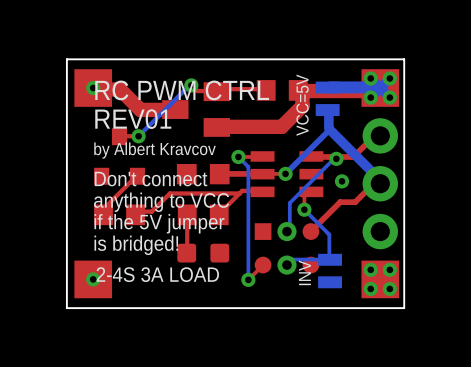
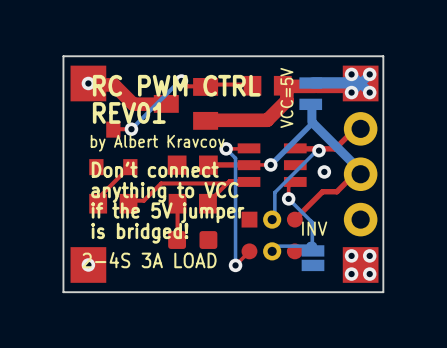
part: (330, 271) -> none
text: INV (304, 272) -> none
INV: none -> (313, 258)

